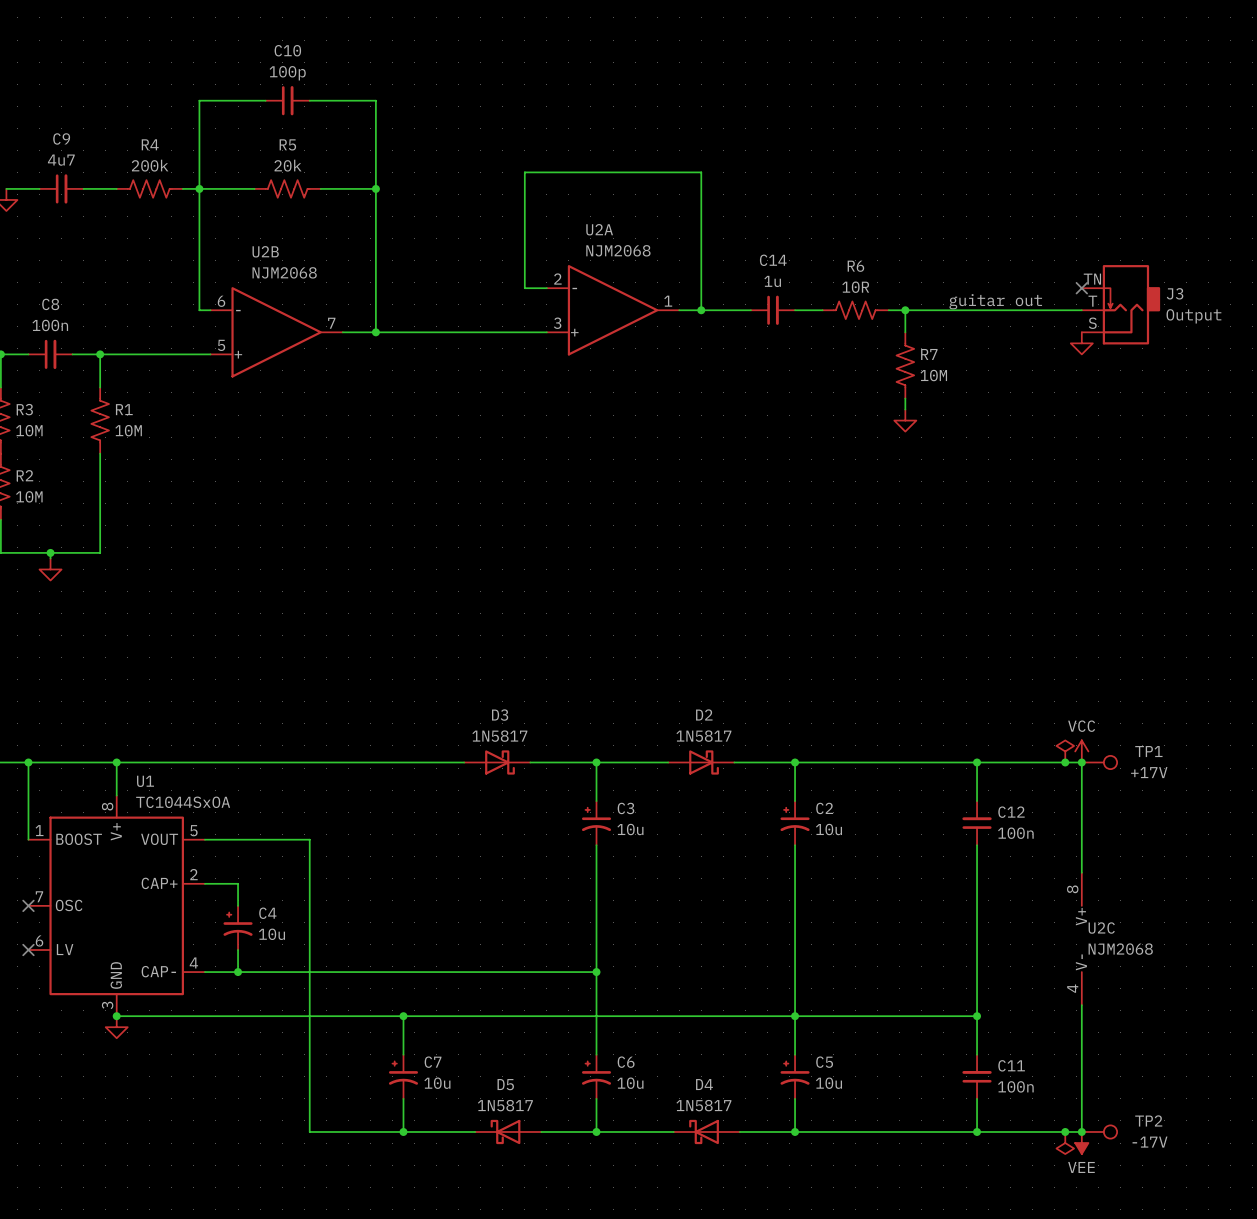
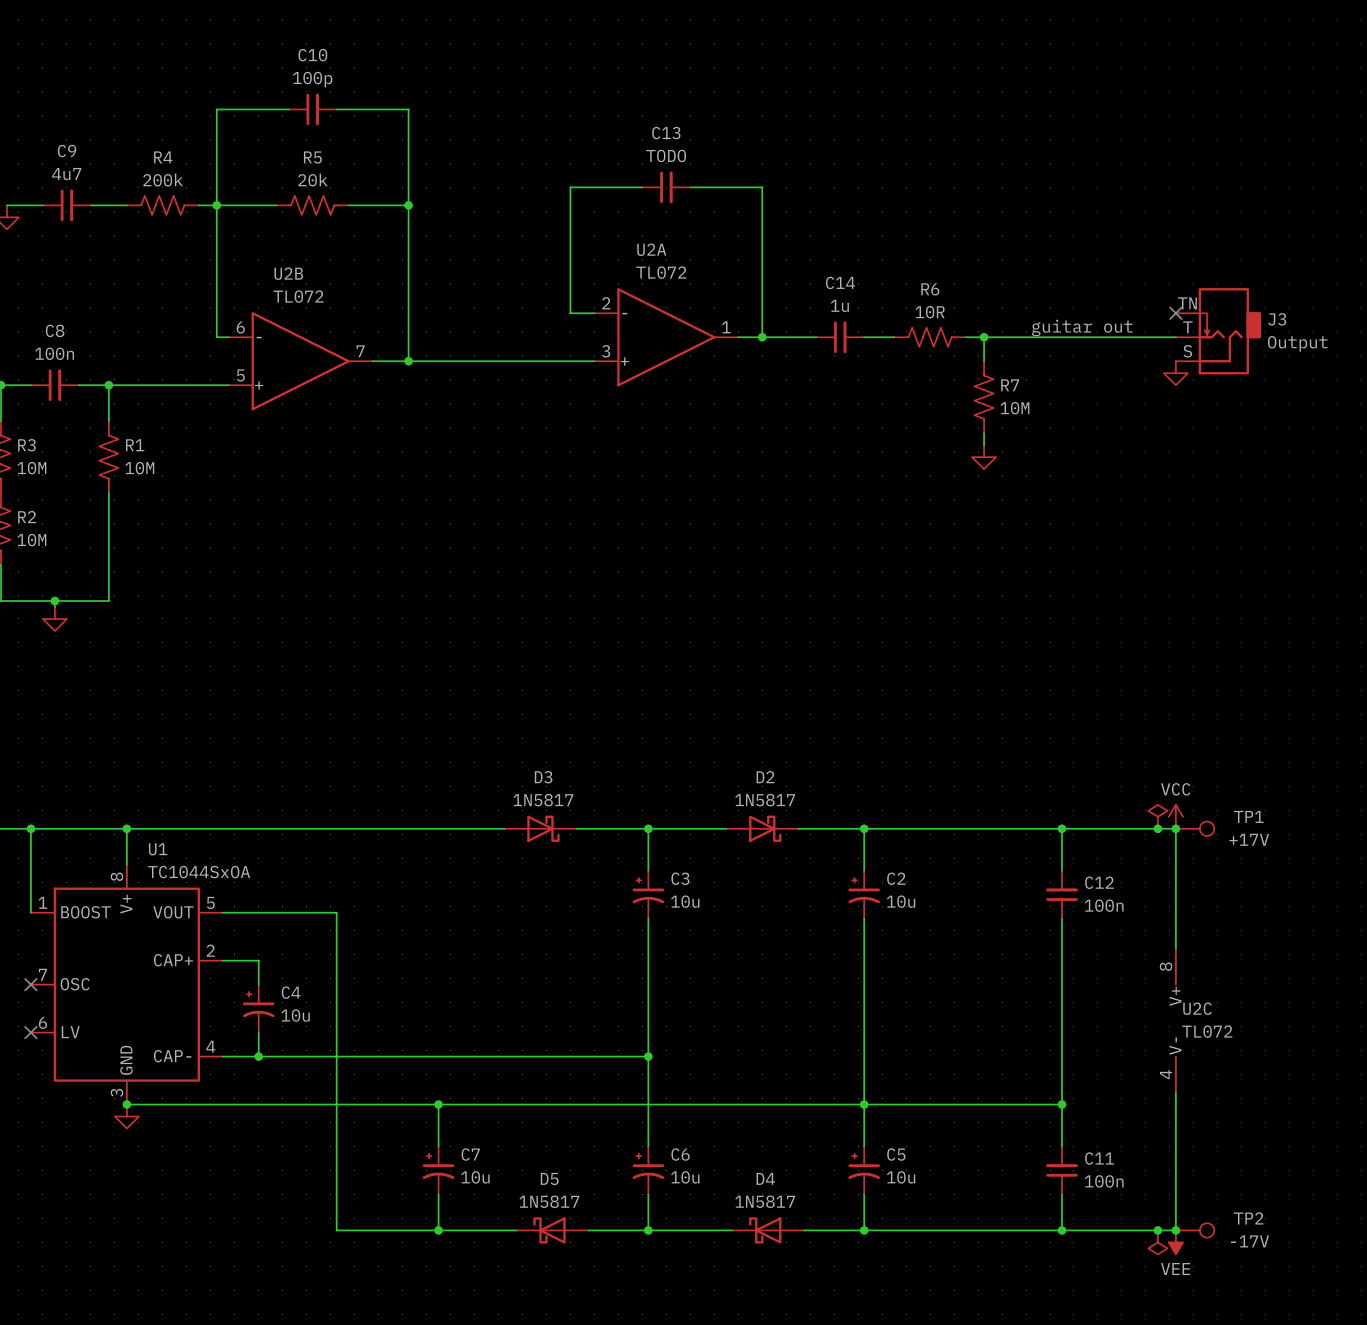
C13: none -> TODO (666, 187)
U2A value: NJM2068 (618, 250) -> TL072 (661, 272)
U2B value: NJM2068 (284, 272) -> TL072 (298, 296)
U2C value: NJM2068 (1120, 949) -> TL072 (1207, 1031)

